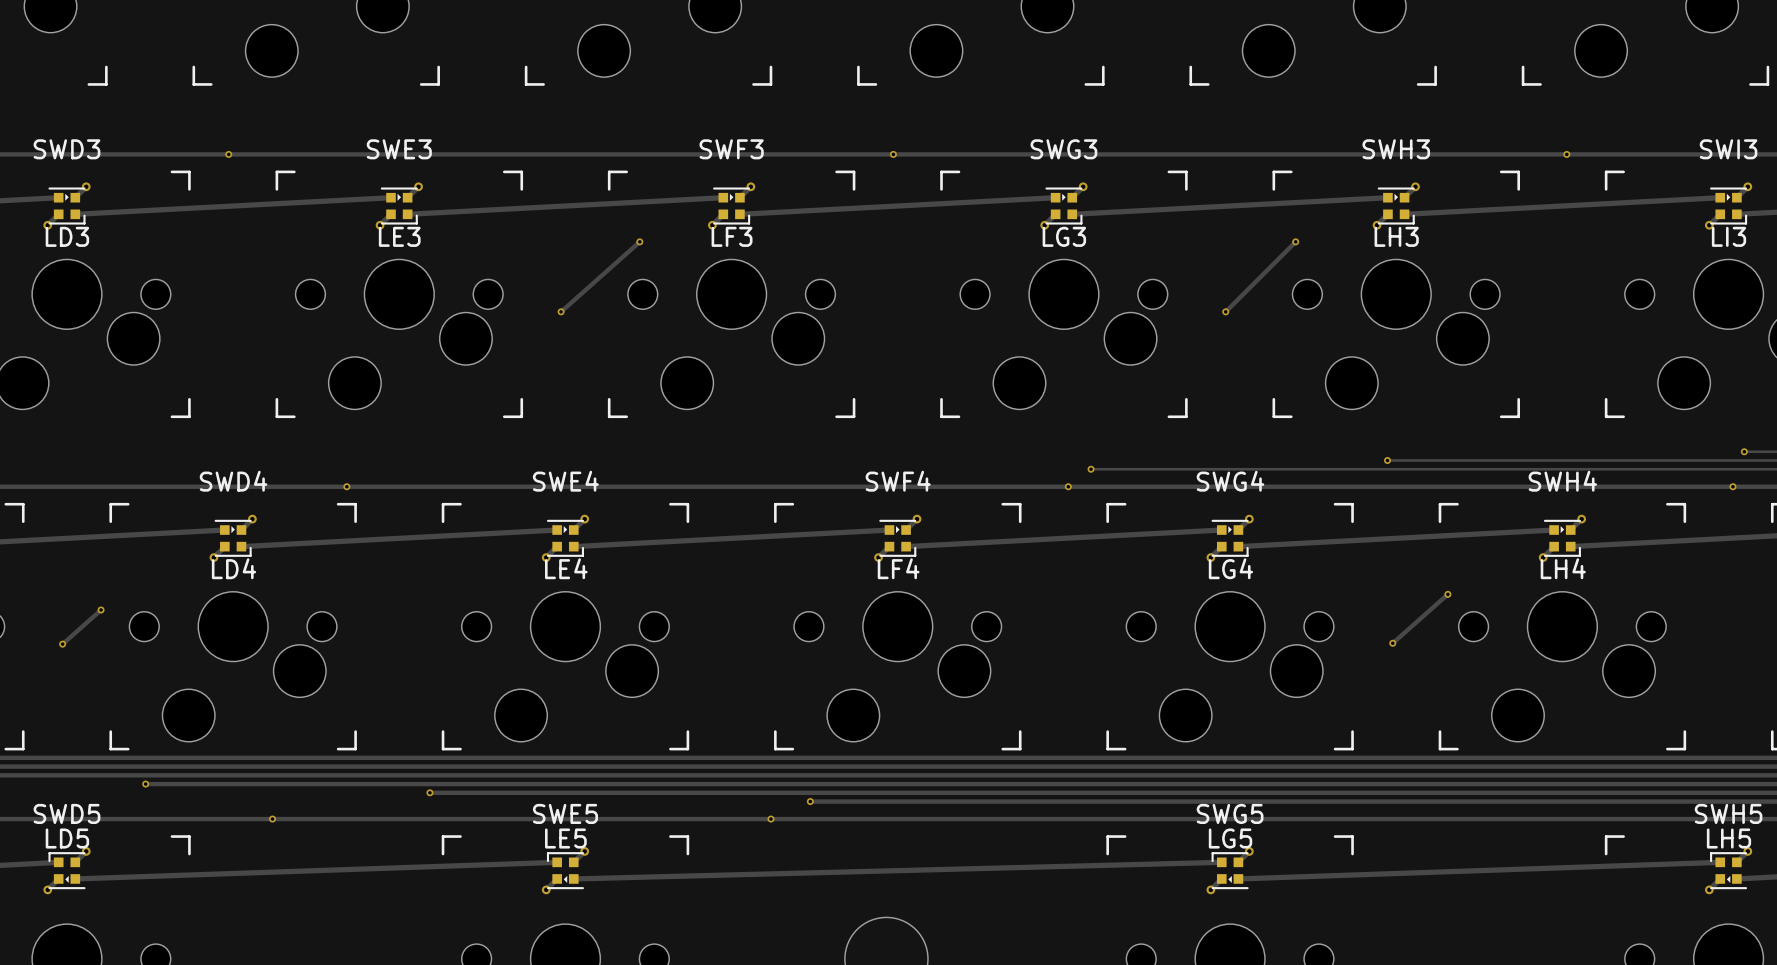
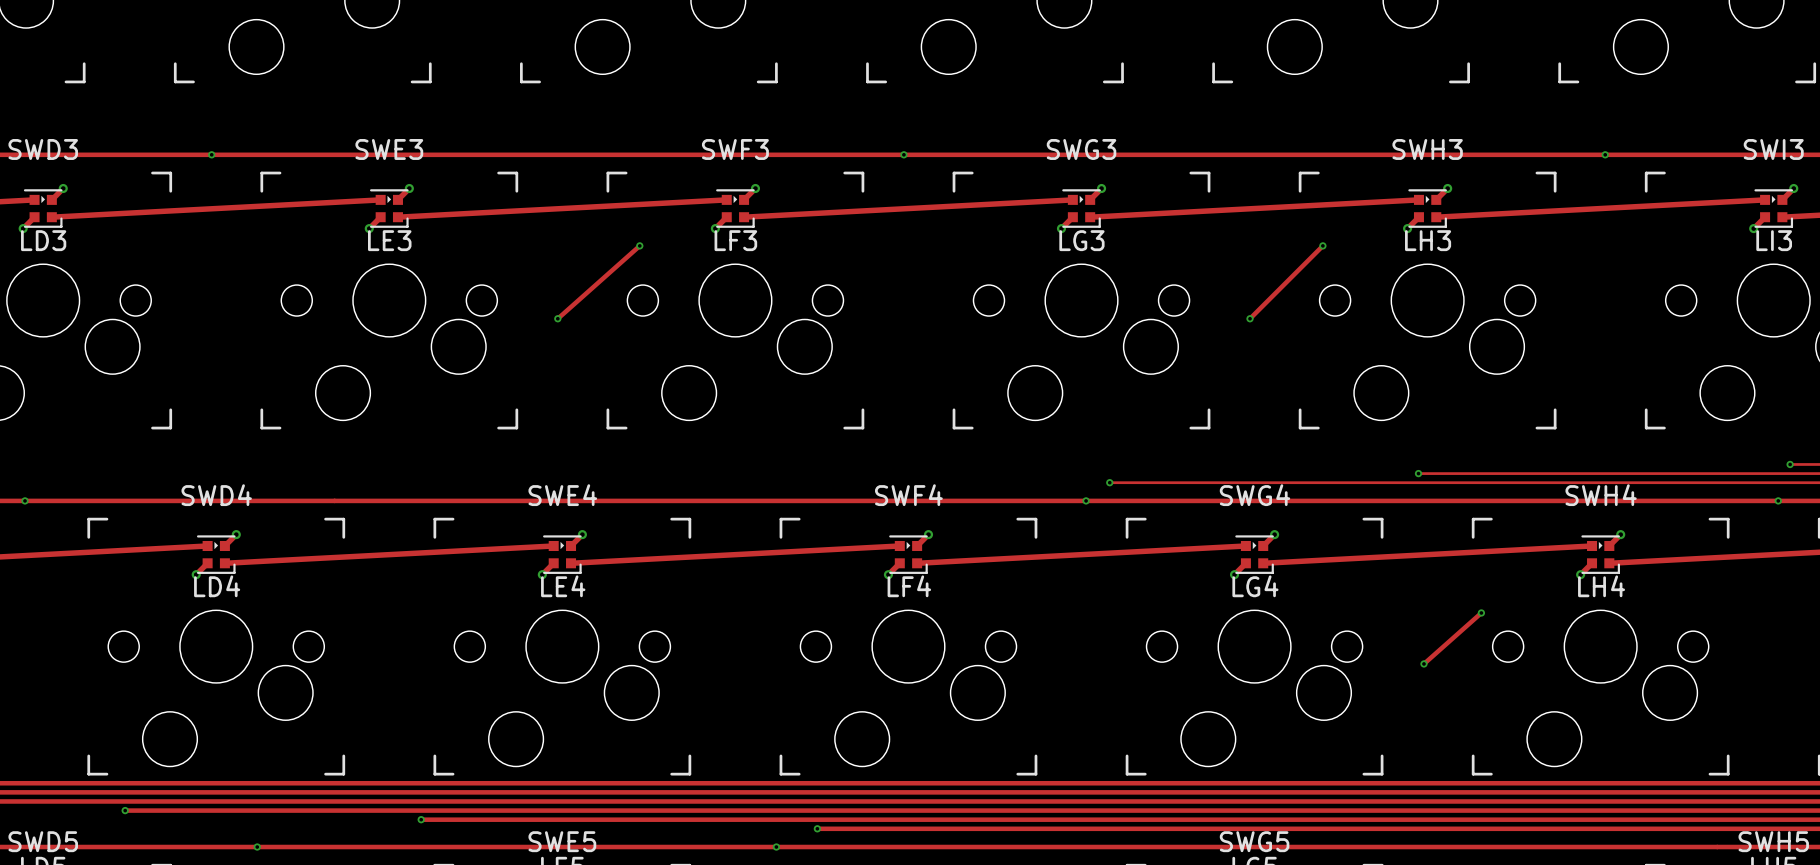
via: none -> (24, 500)
via: (346, 486) -> none
track: (101, 609) (62, 644) -> none
via: (101, 609) -> none
via: (62, 644) -> none

